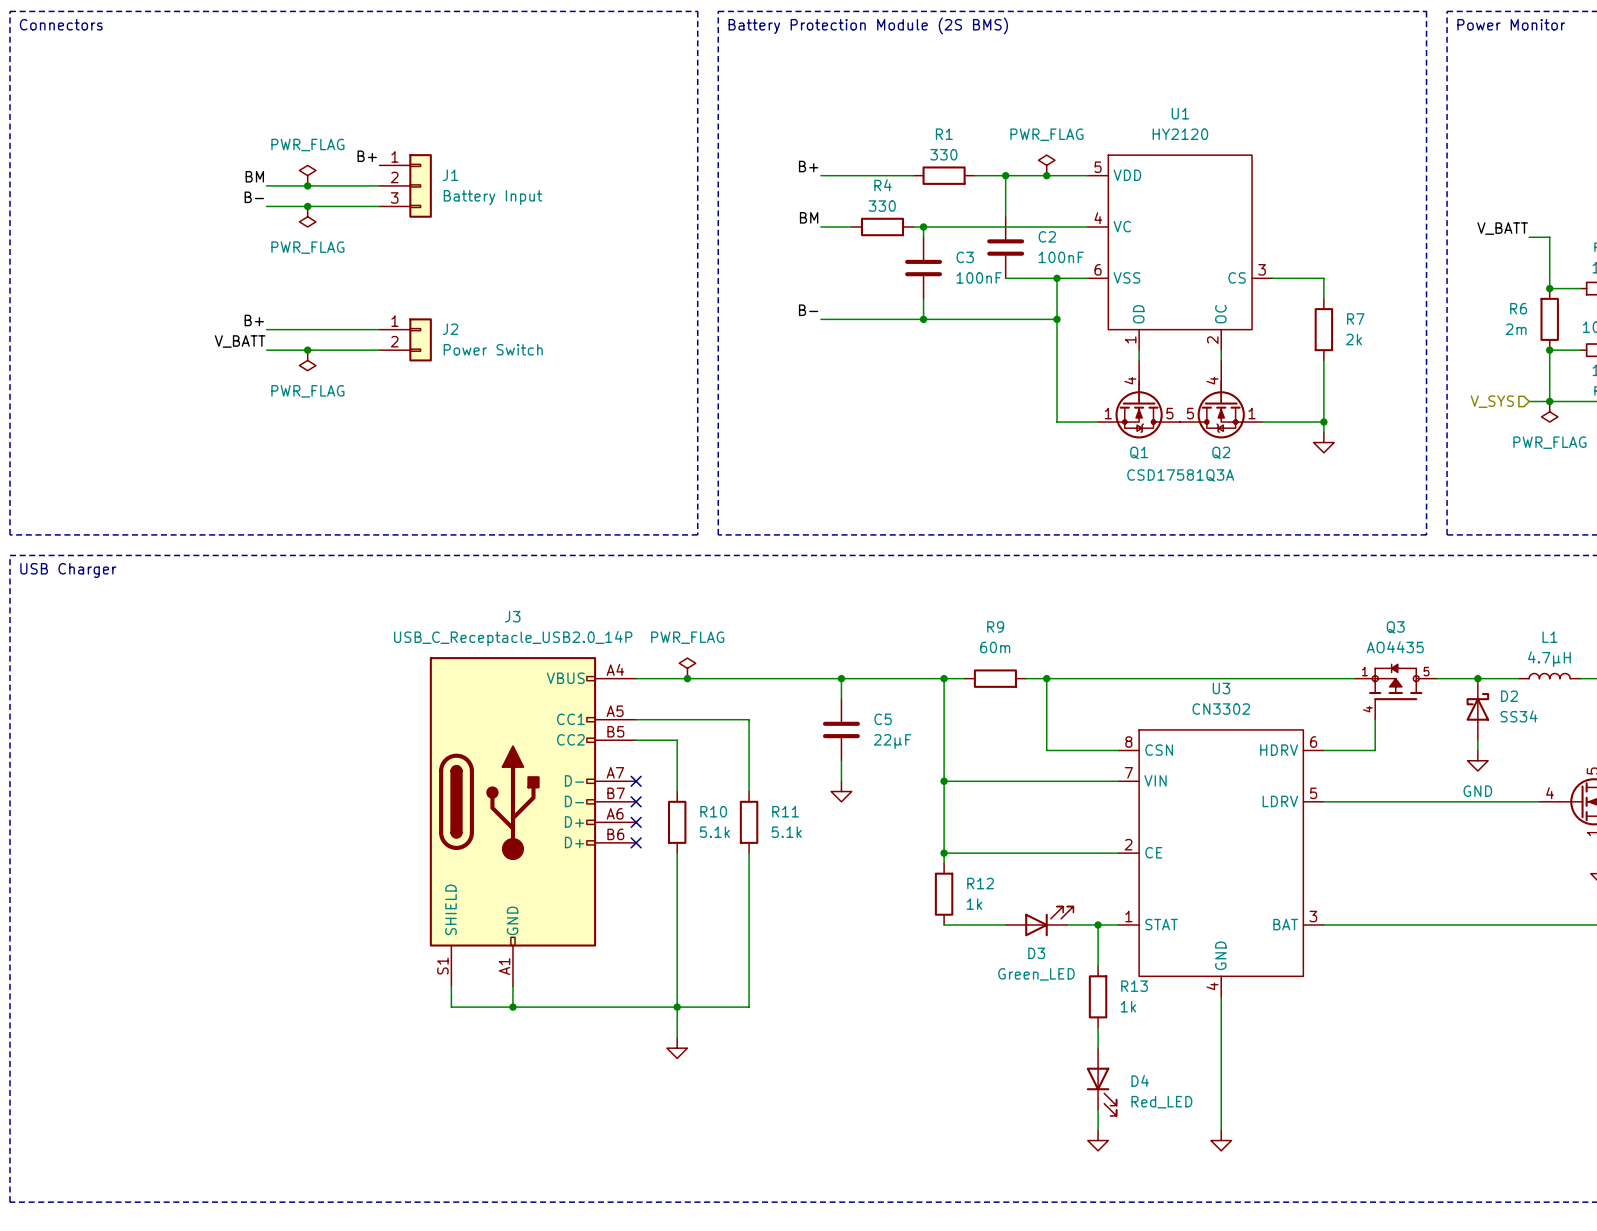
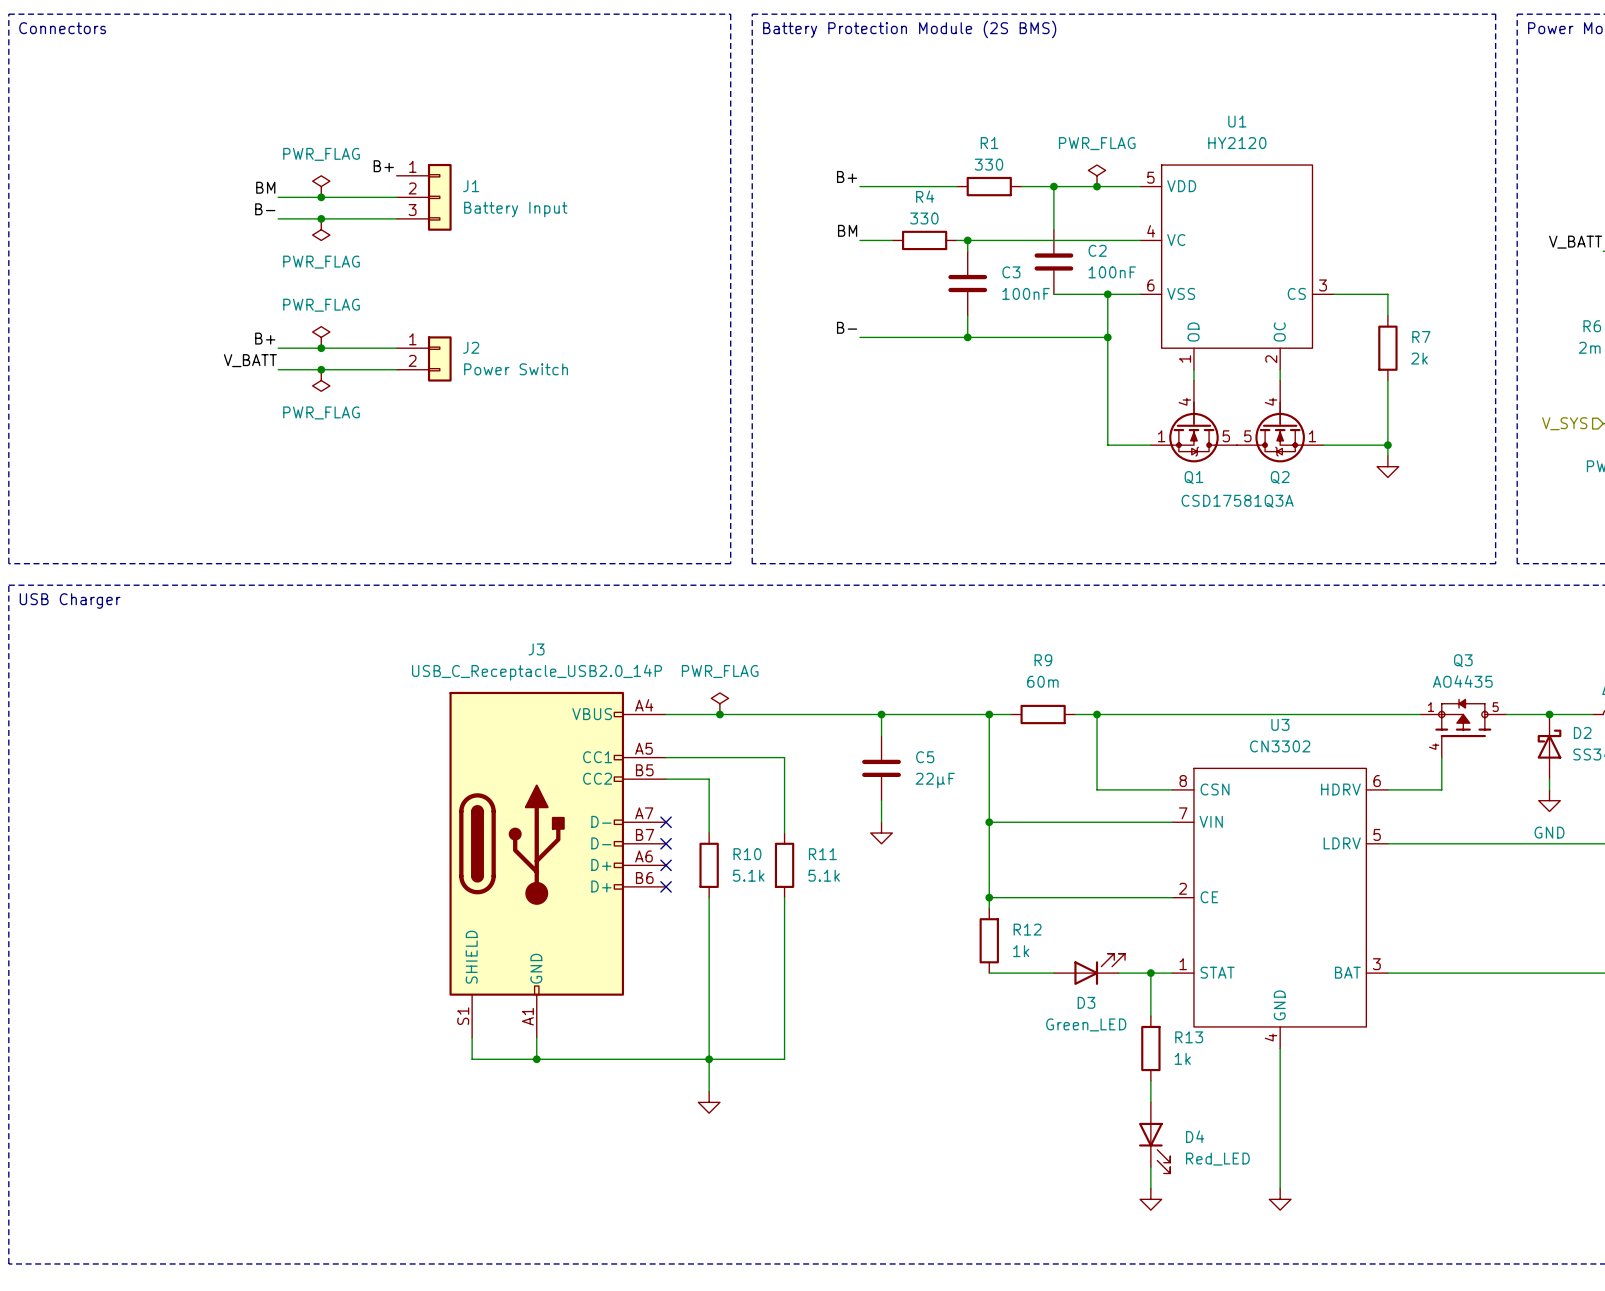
power symbol: none -> PWR_FLAG (321, 337)
junction: none -> (321, 348)

